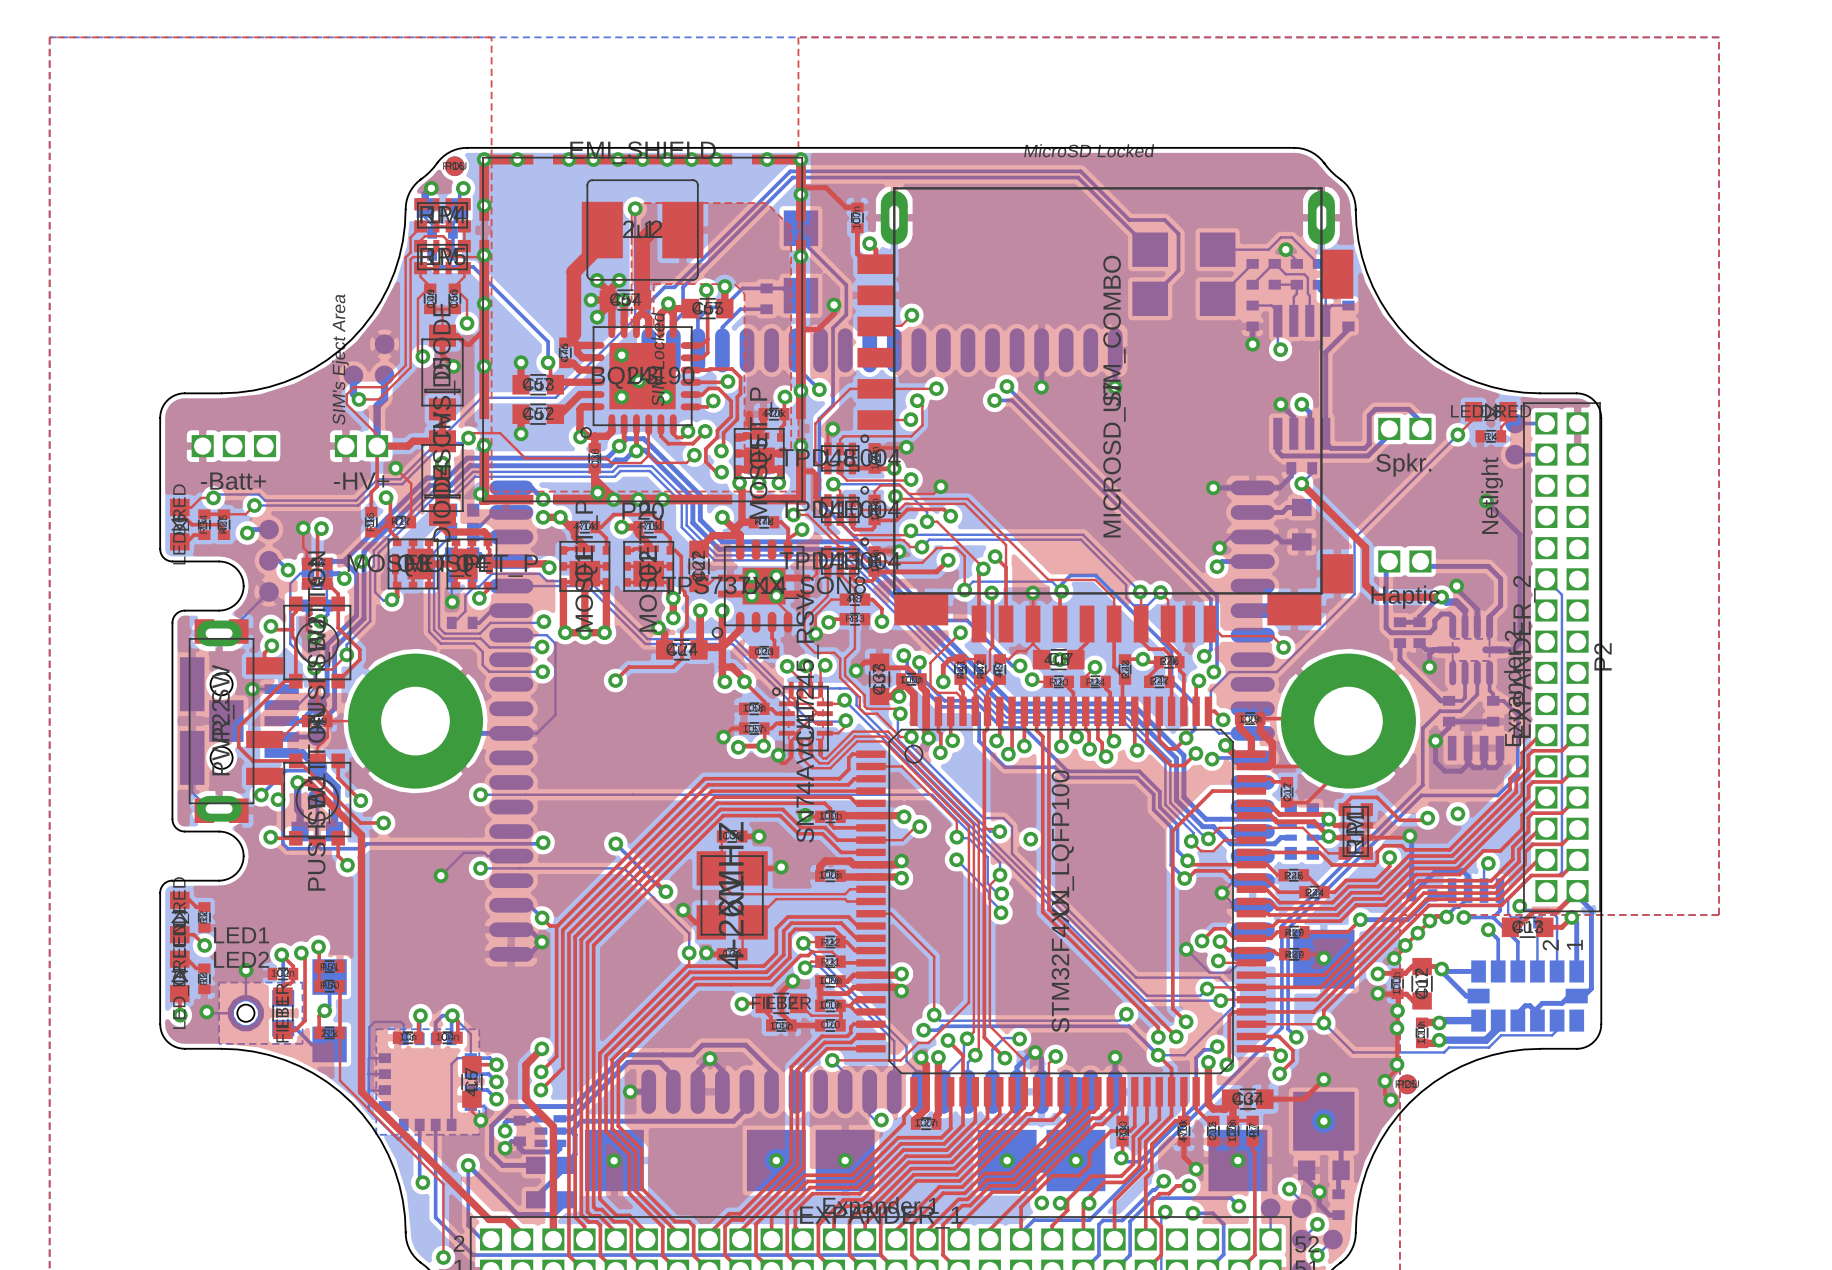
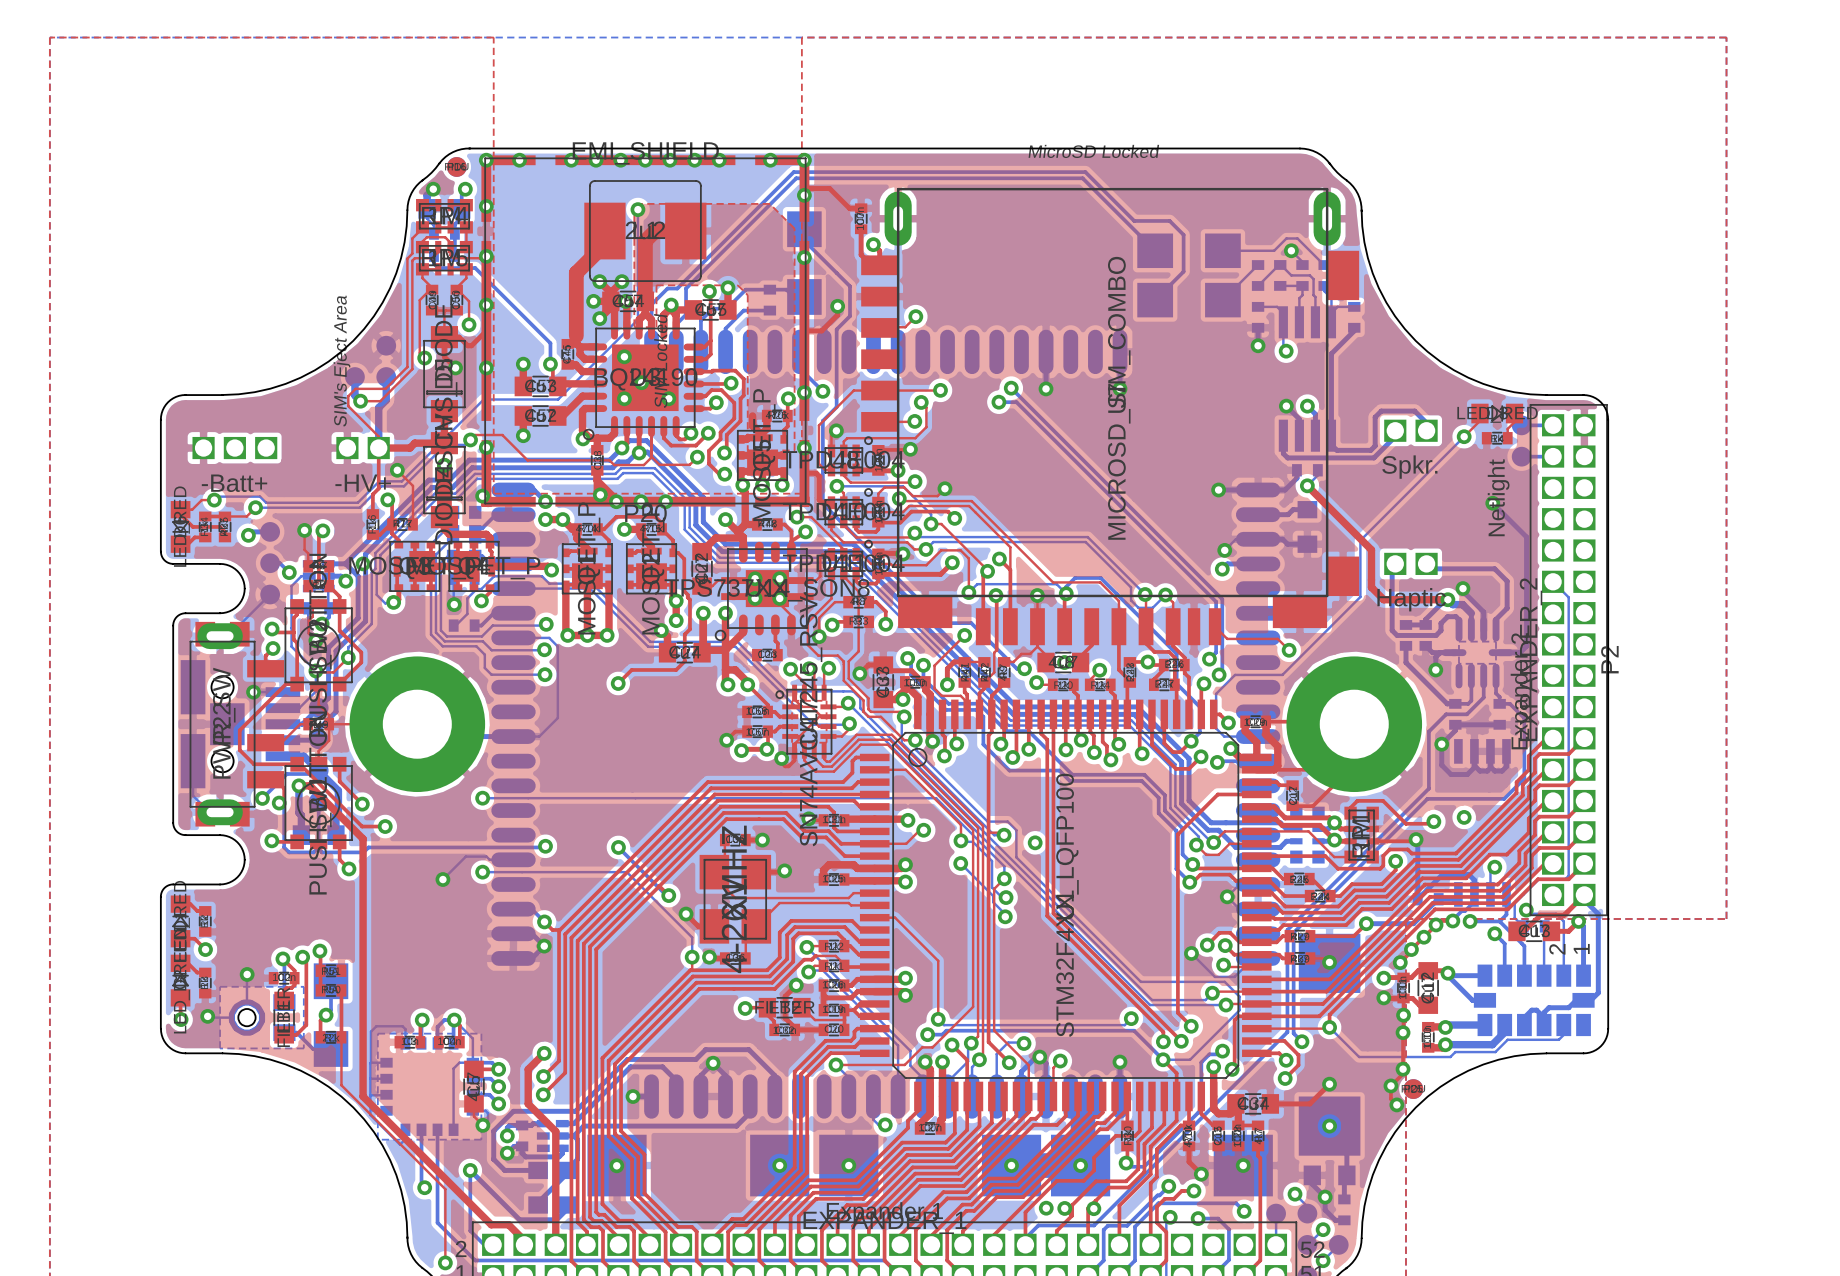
text: LED1 (241, 935) -> none
text: LED2 (241, 959) -> none

